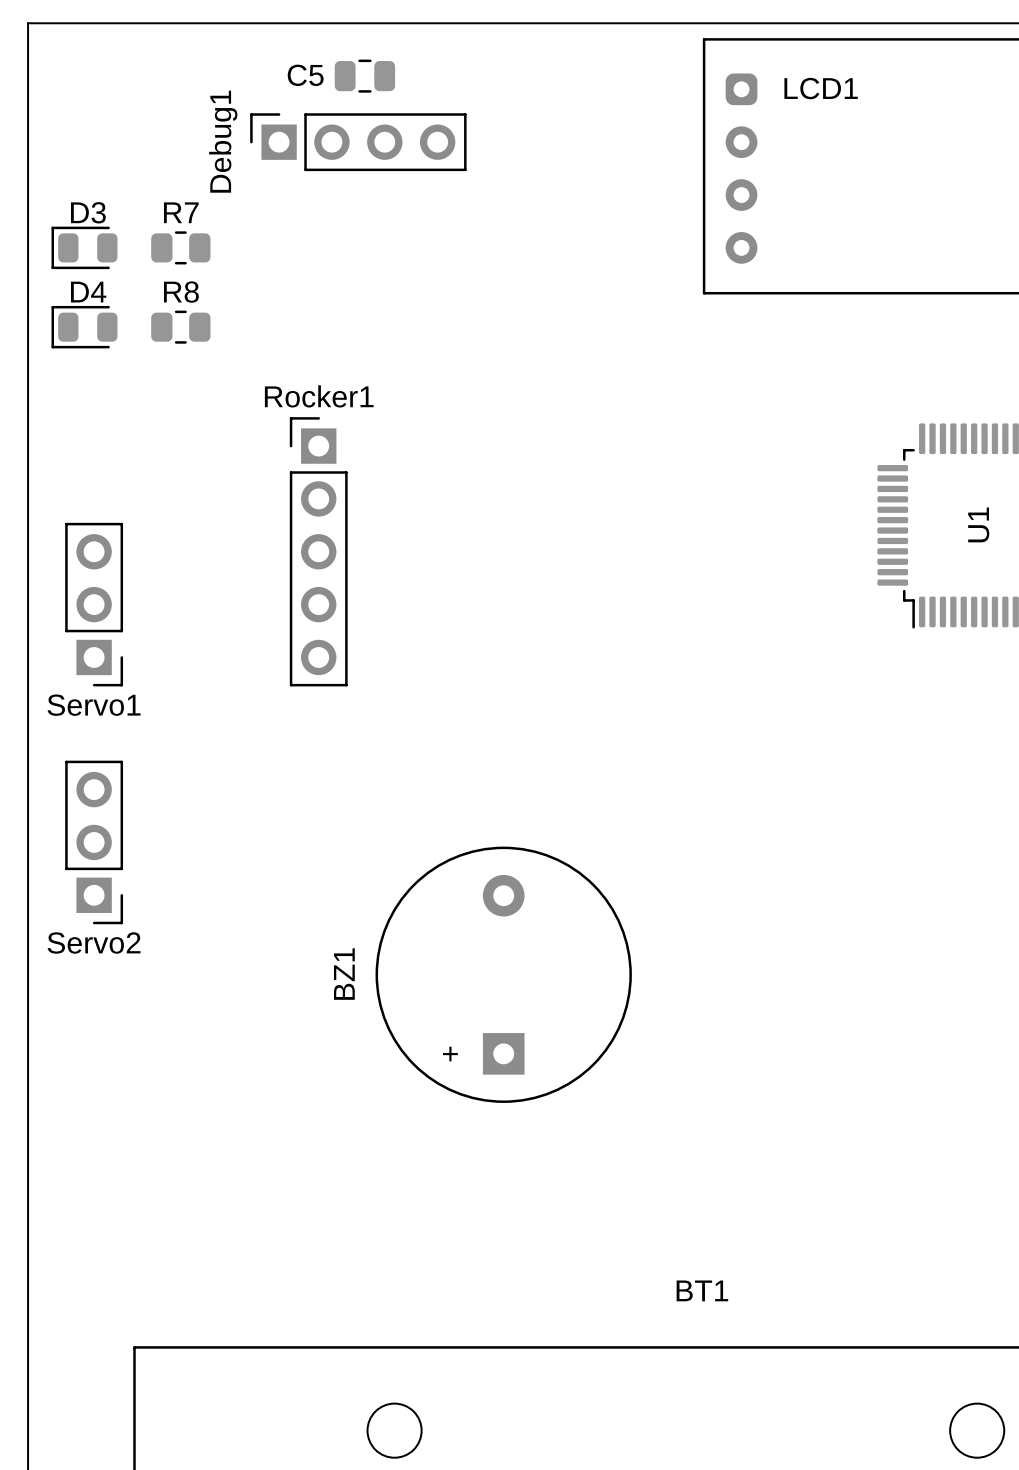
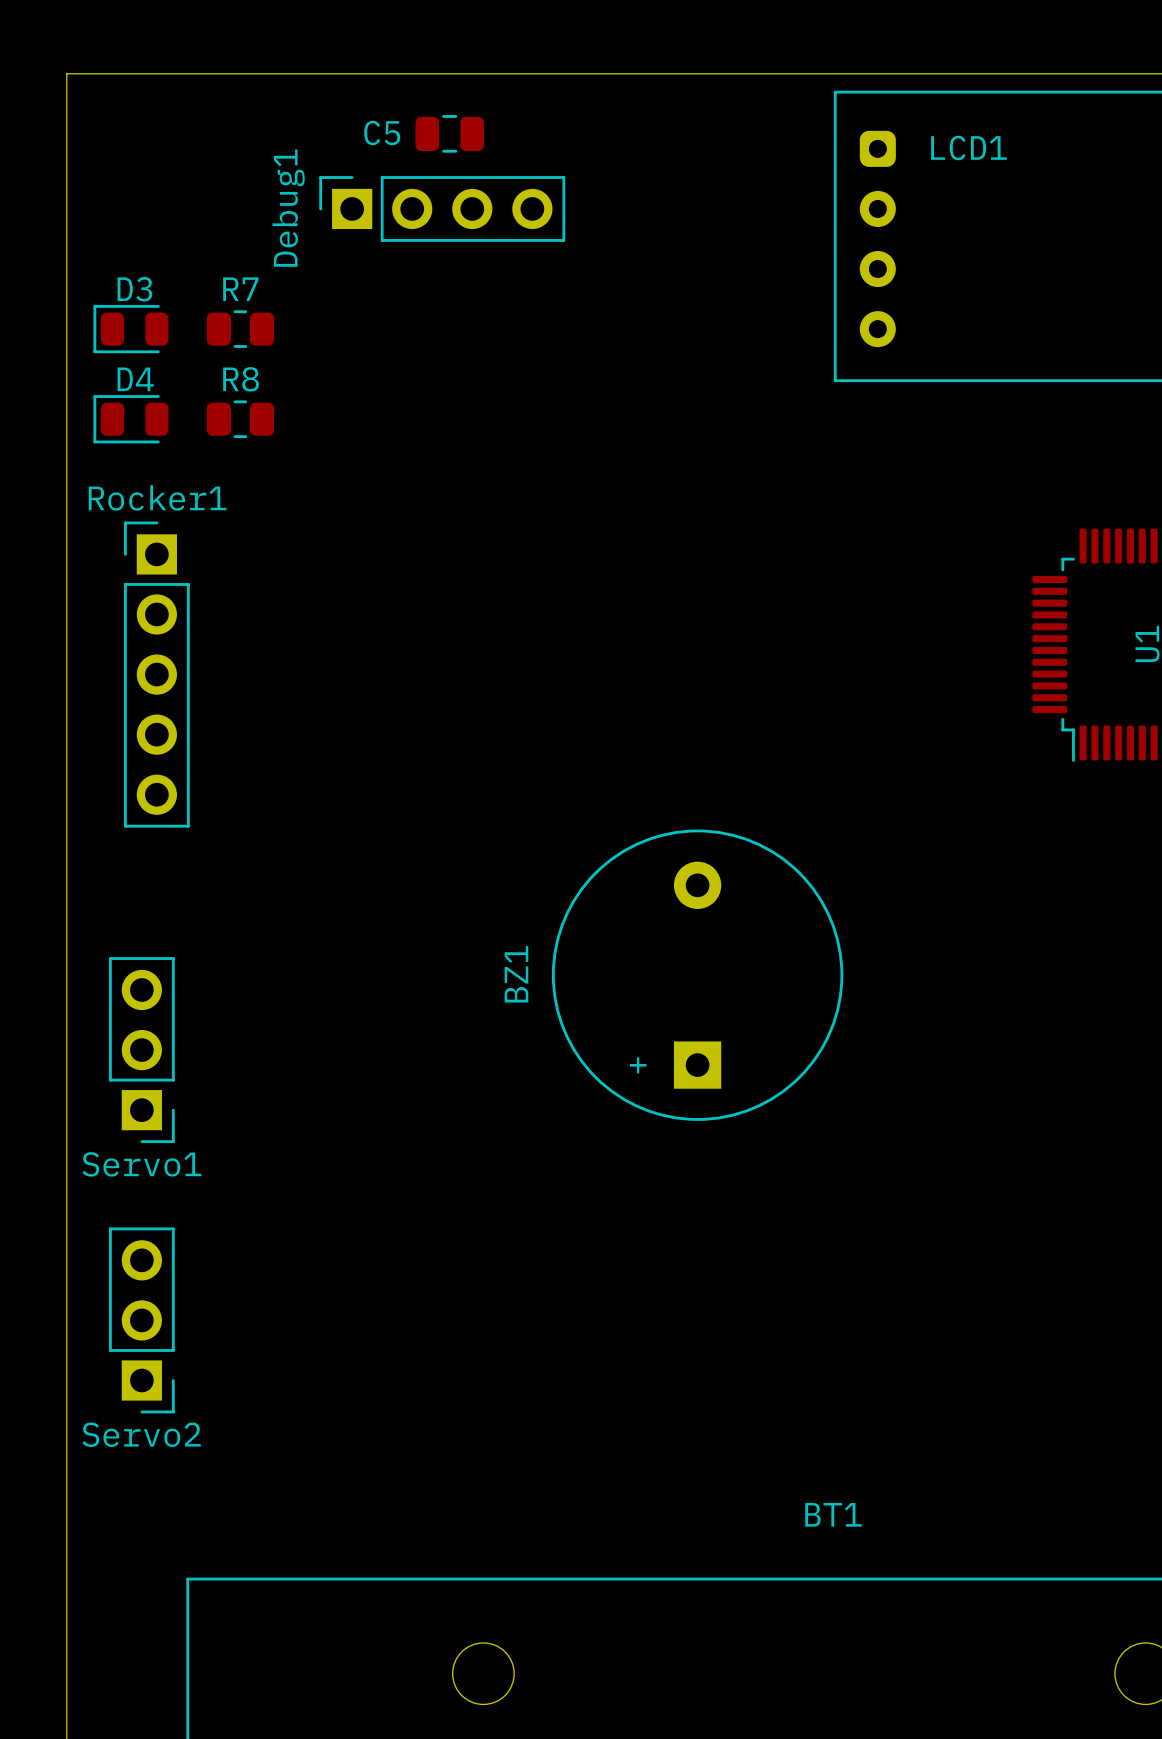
Rocker1 position: (318, 551) -> (156, 674)
Servo1 position: (94, 604) -> (141, 1050)
Servo2 position: (94, 842) -> (141, 1320)
BZ1 position: (503, 974) -> (697, 975)

